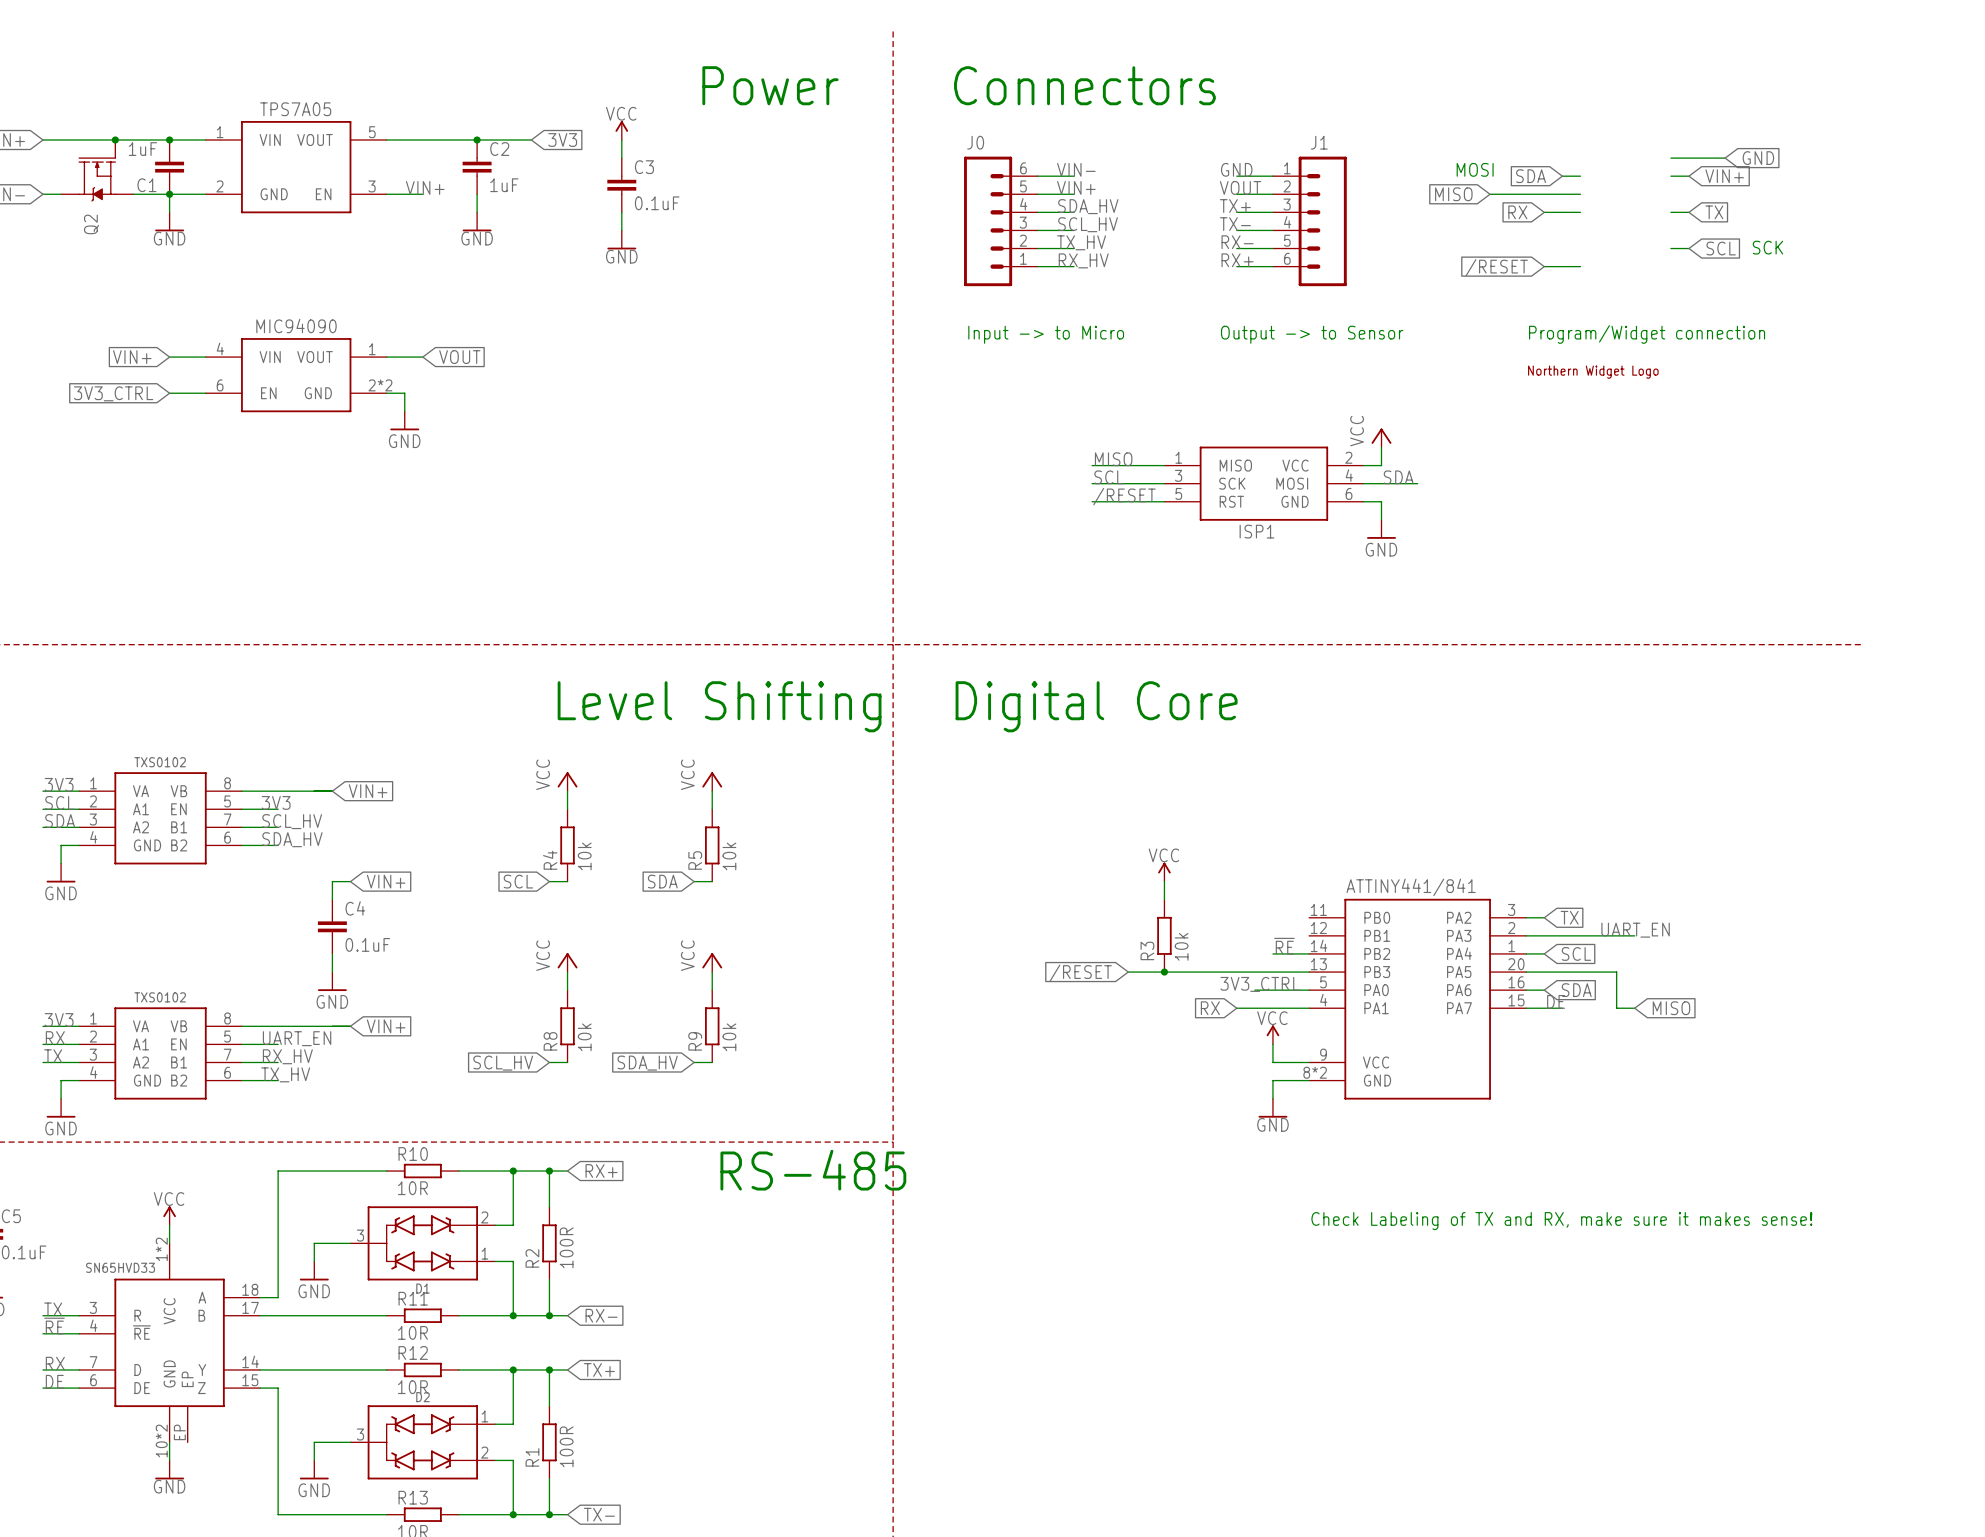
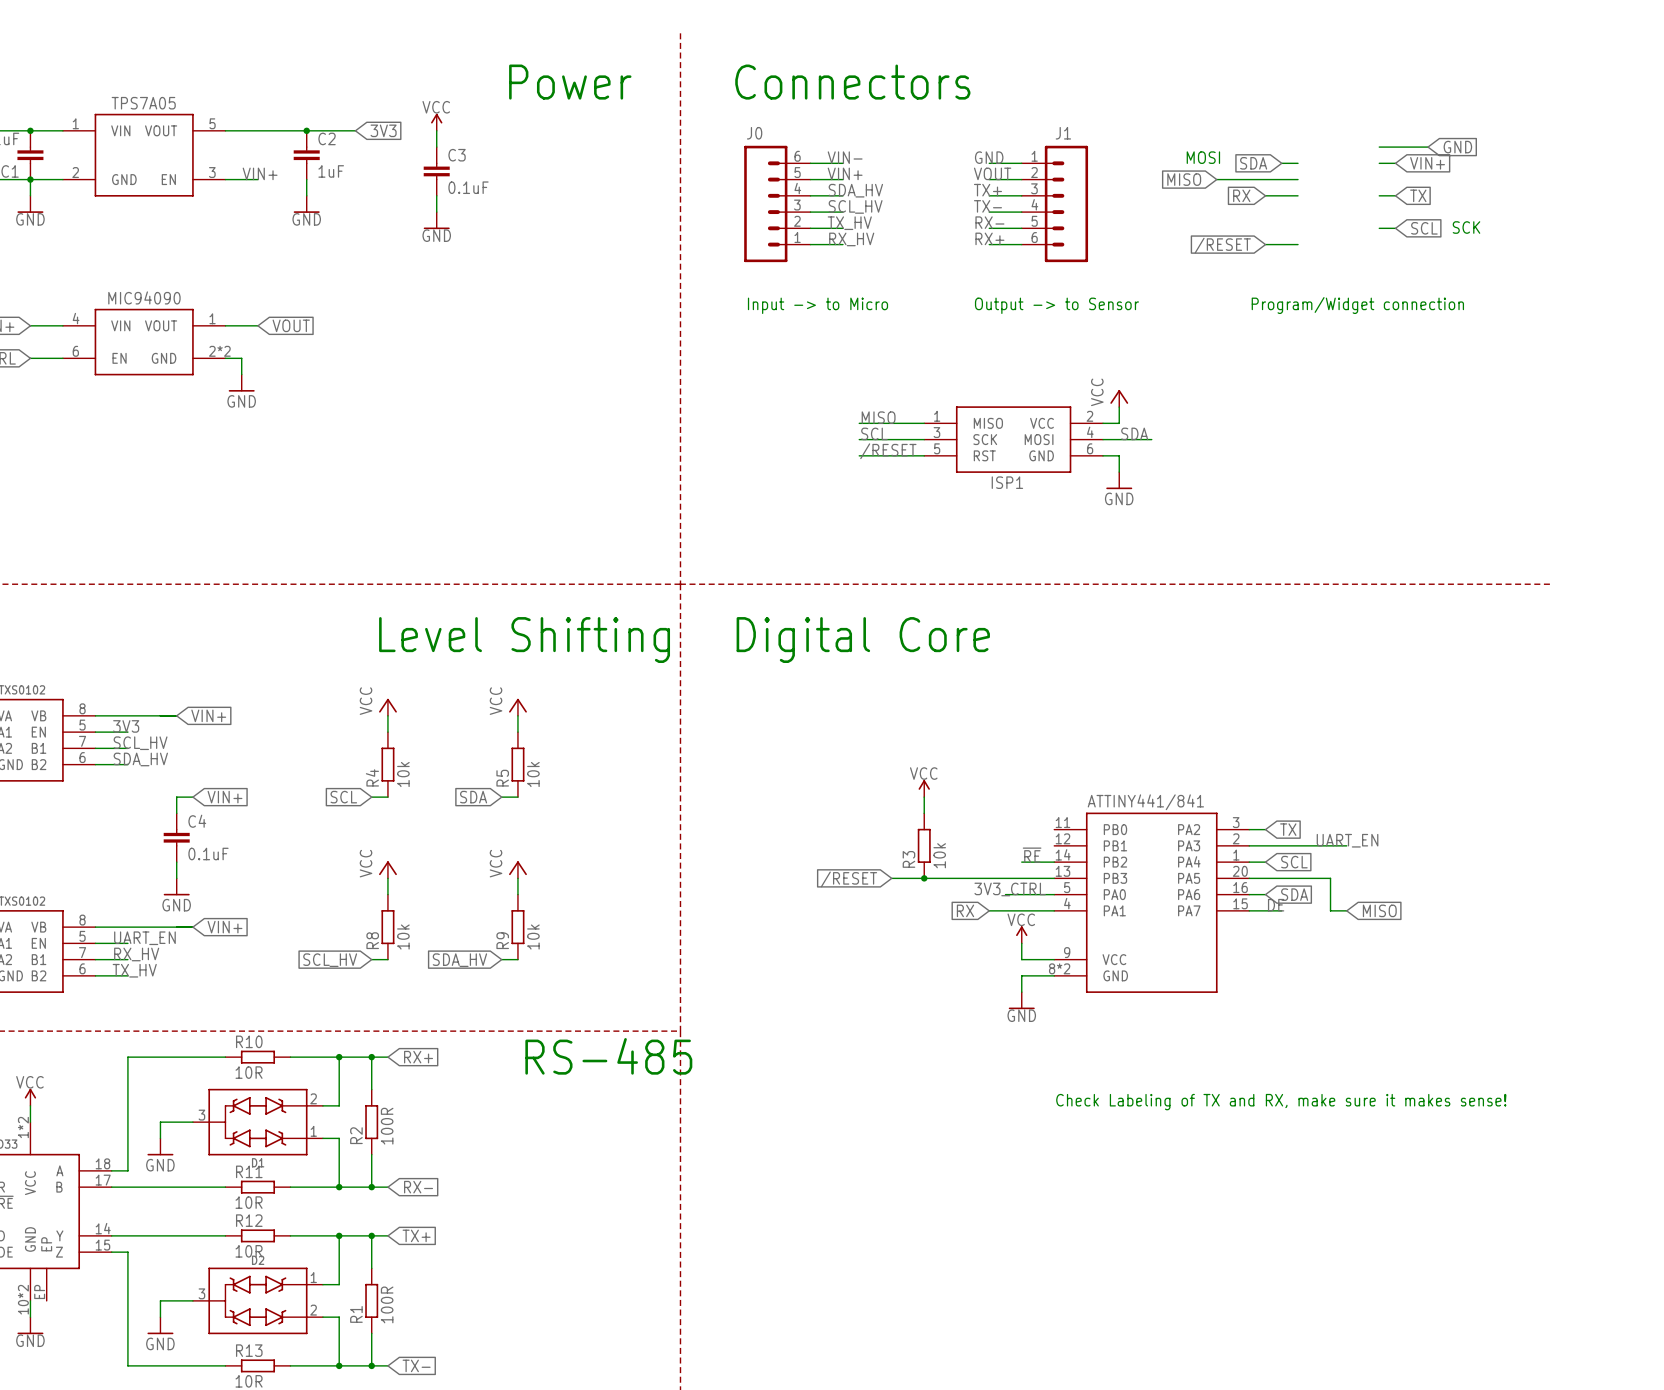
part: (1593, 372) -> none

